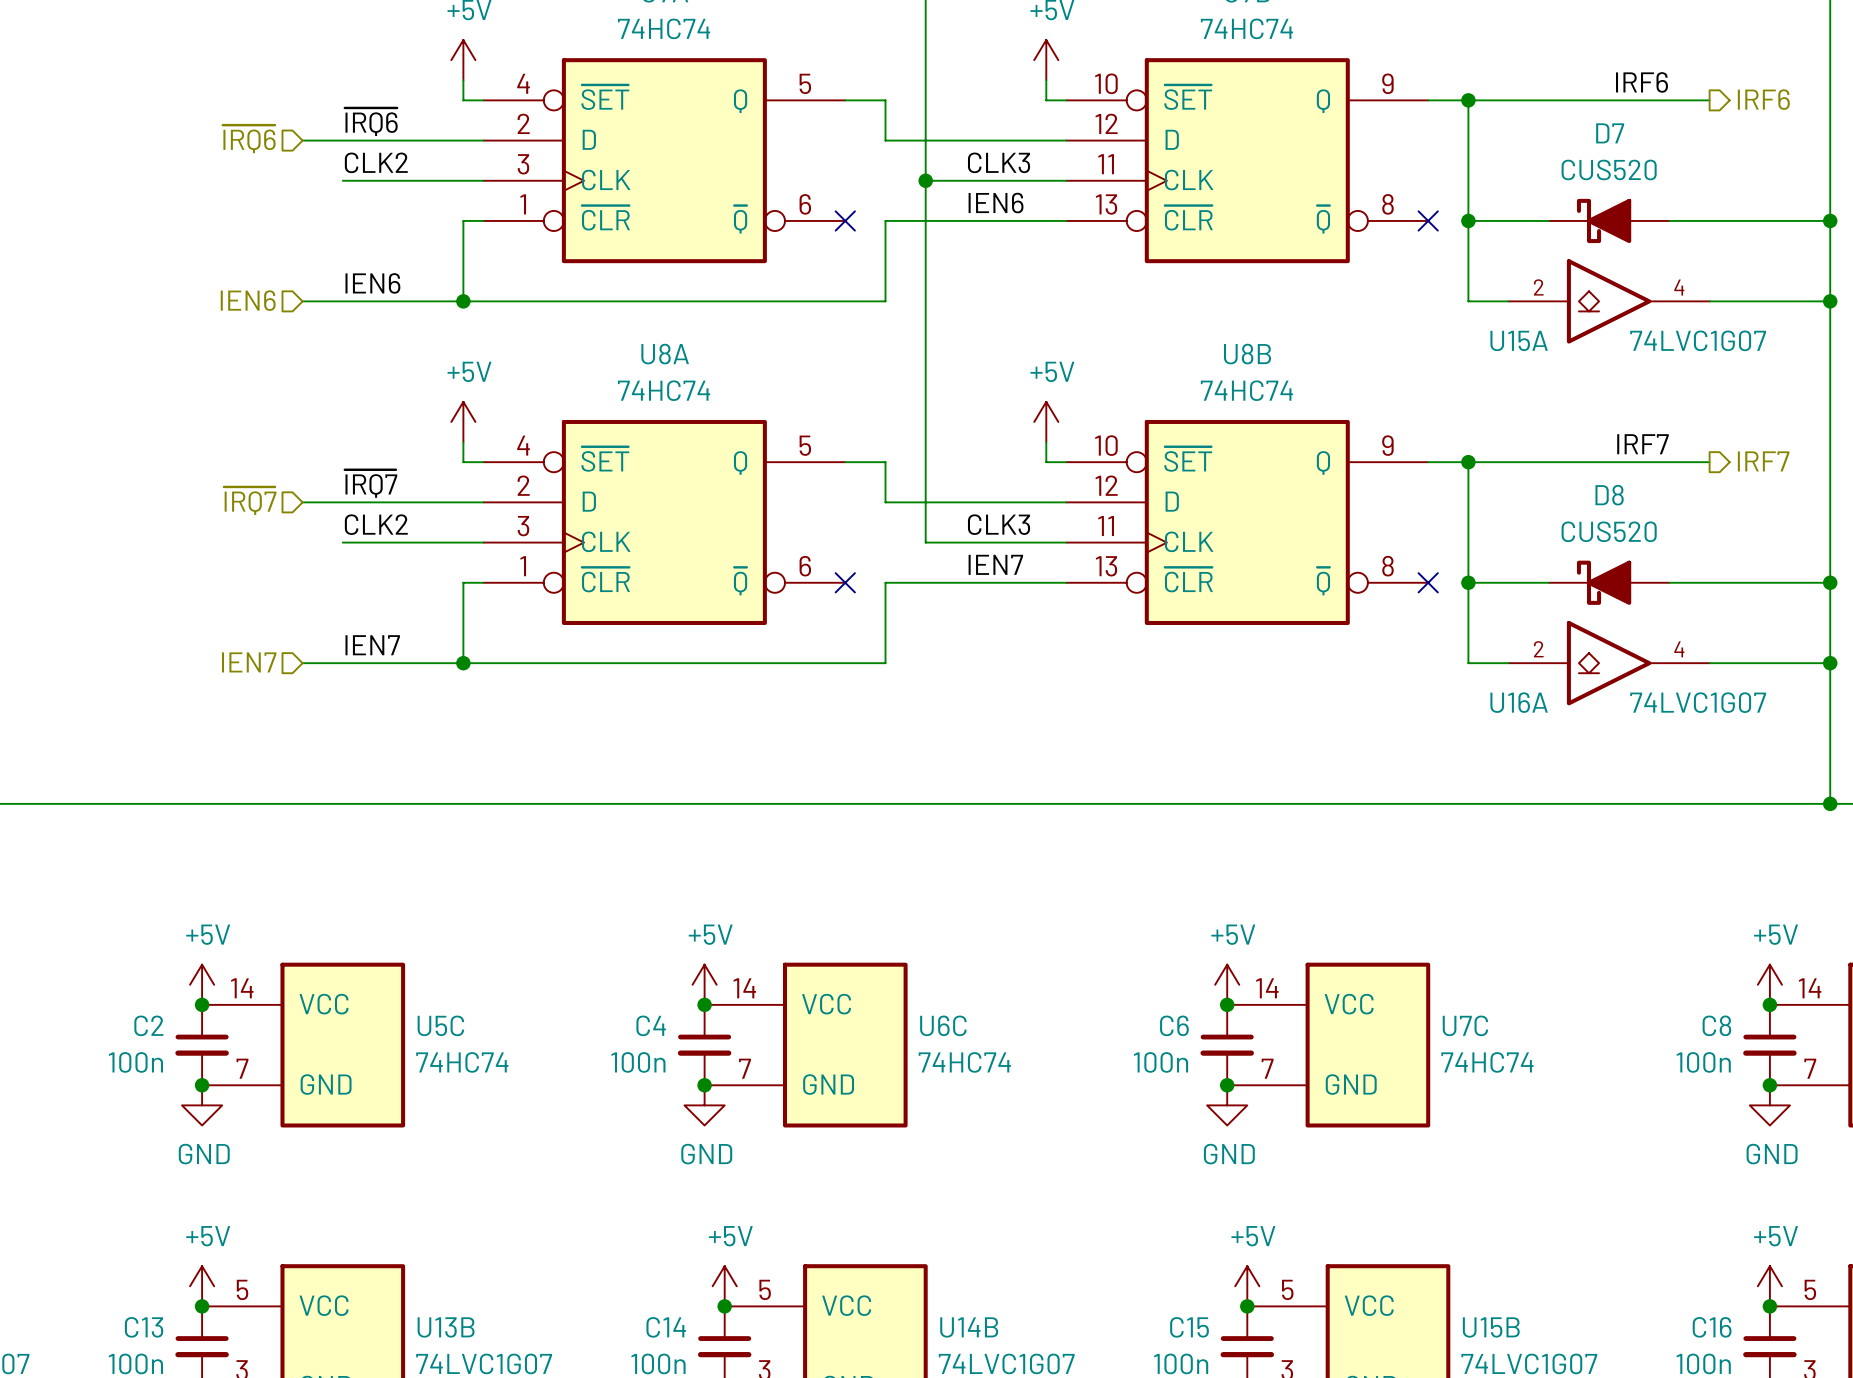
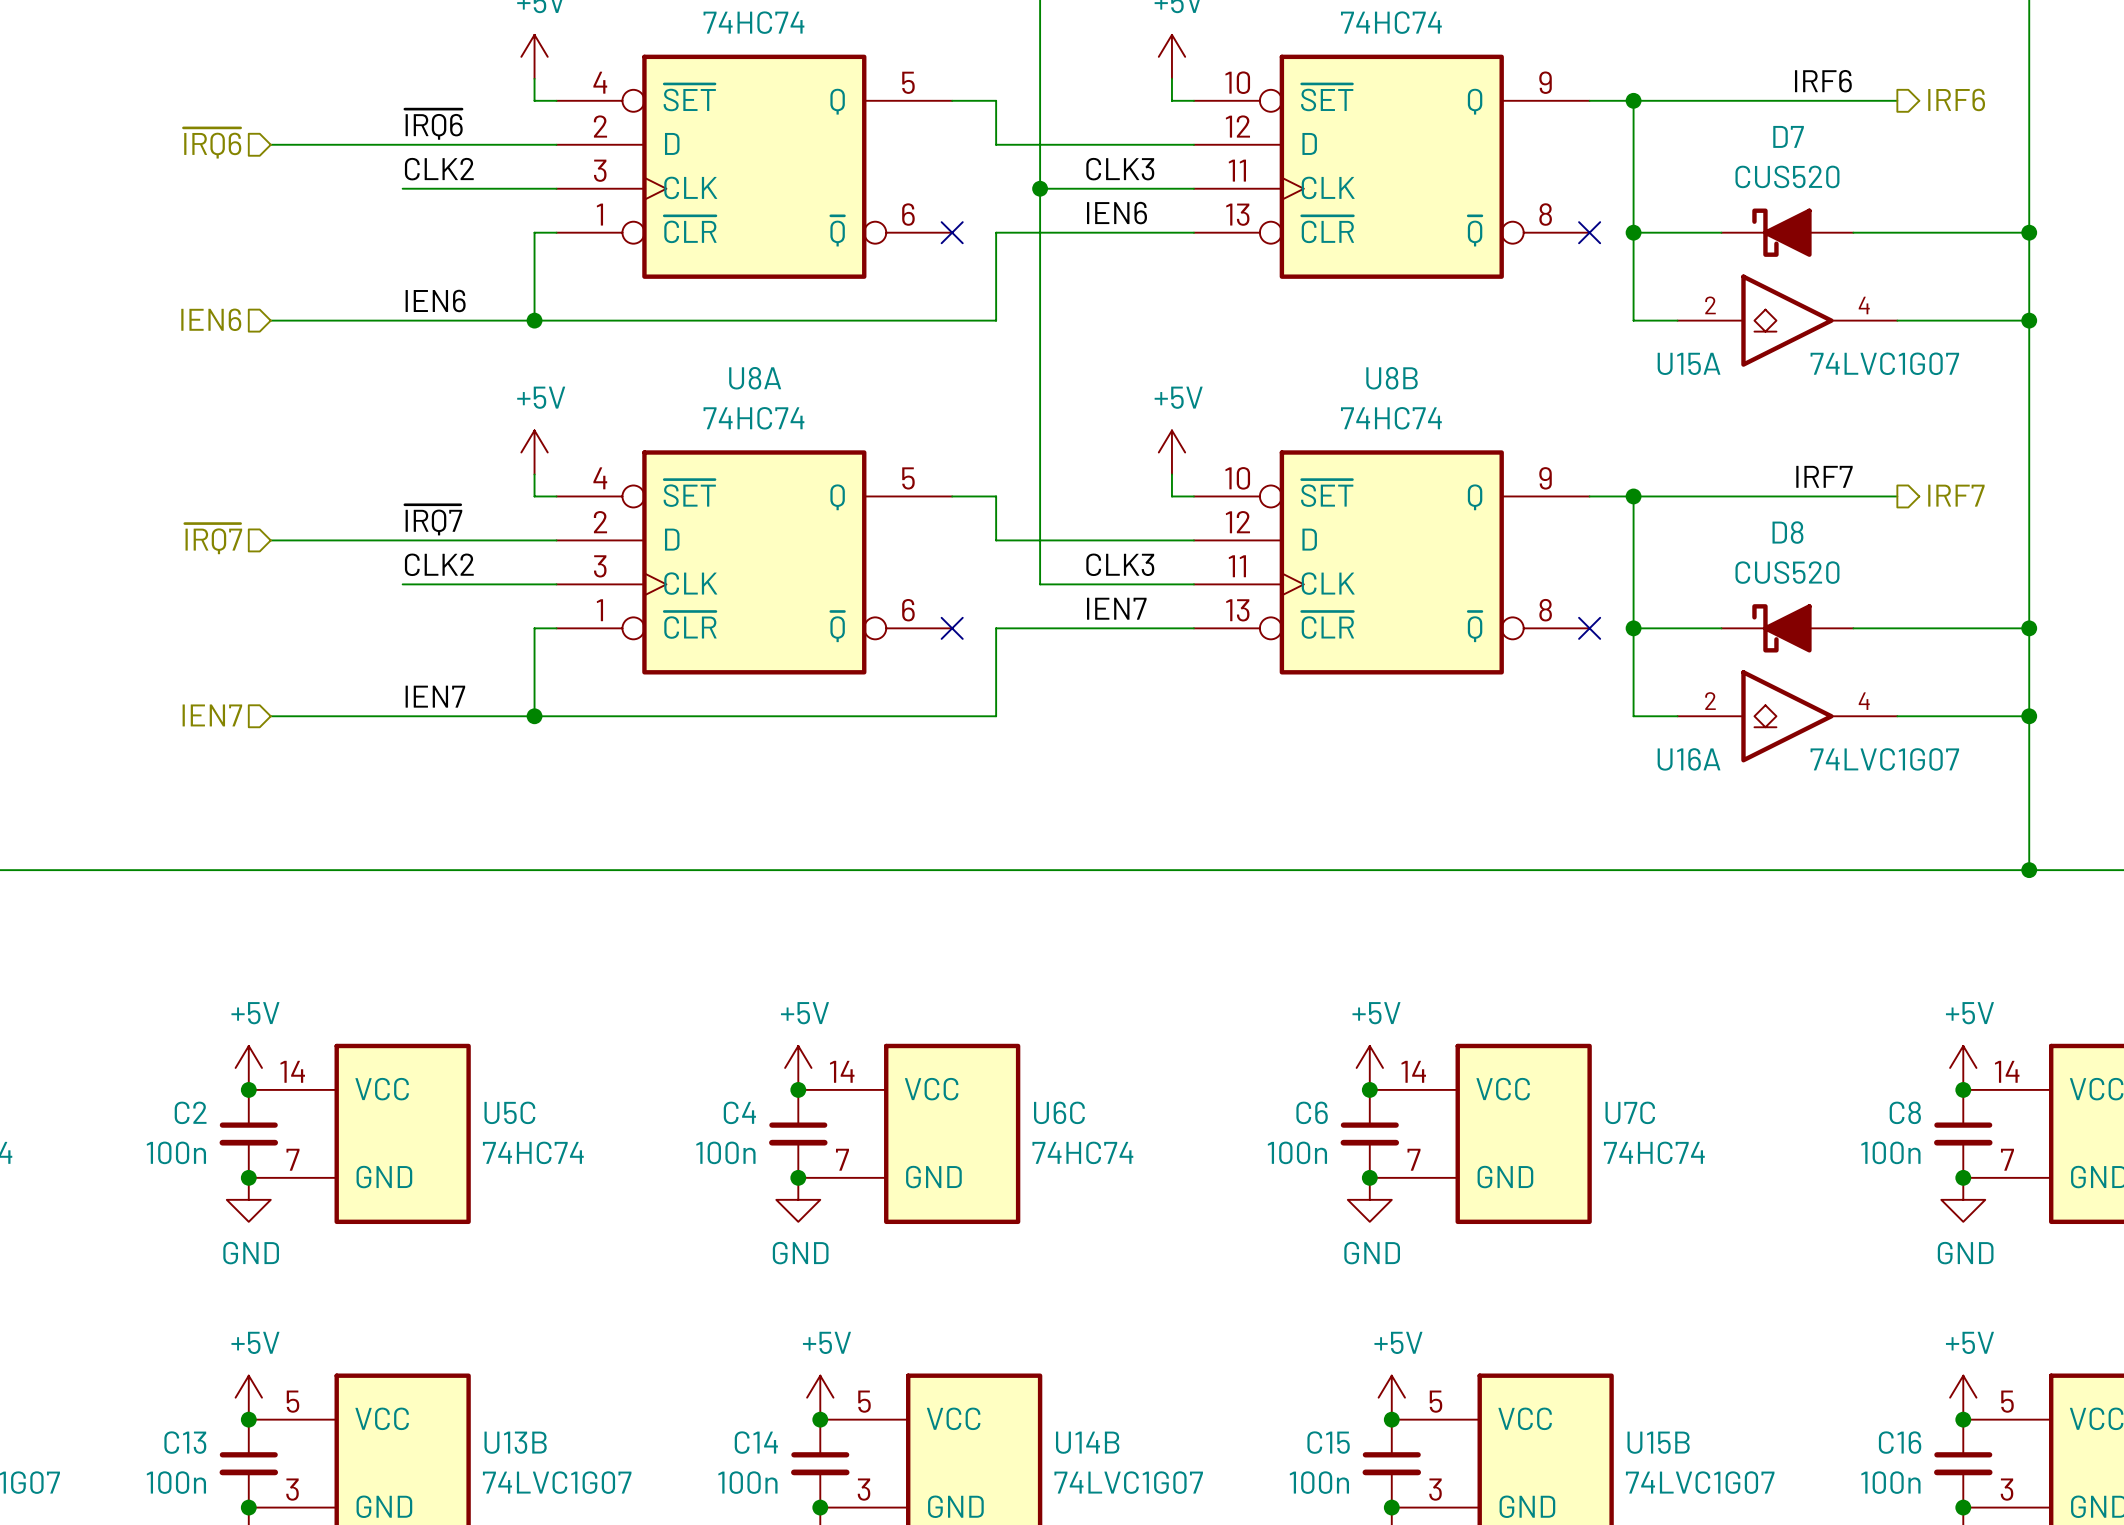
hierarchical label position: ~{IRQ6} (249, 139) -> ~{IRQ6} (212, 143)
wire: none -> (270, 144) (358, 144)
hierarchical label position: IEN6 (248, 300) -> IEN6 (211, 319)
wire: none -> (270, 320) (358, 320)
hierarchical label position: ~{IRQ7} (250, 500) -> ~{IRQ7} (213, 538)
wire: none -> (270, 540) (358, 540)
hierarchical label position: IEN7 (249, 662) -> IEN7 (212, 715)
wire: none -> (270, 716) (358, 716)

